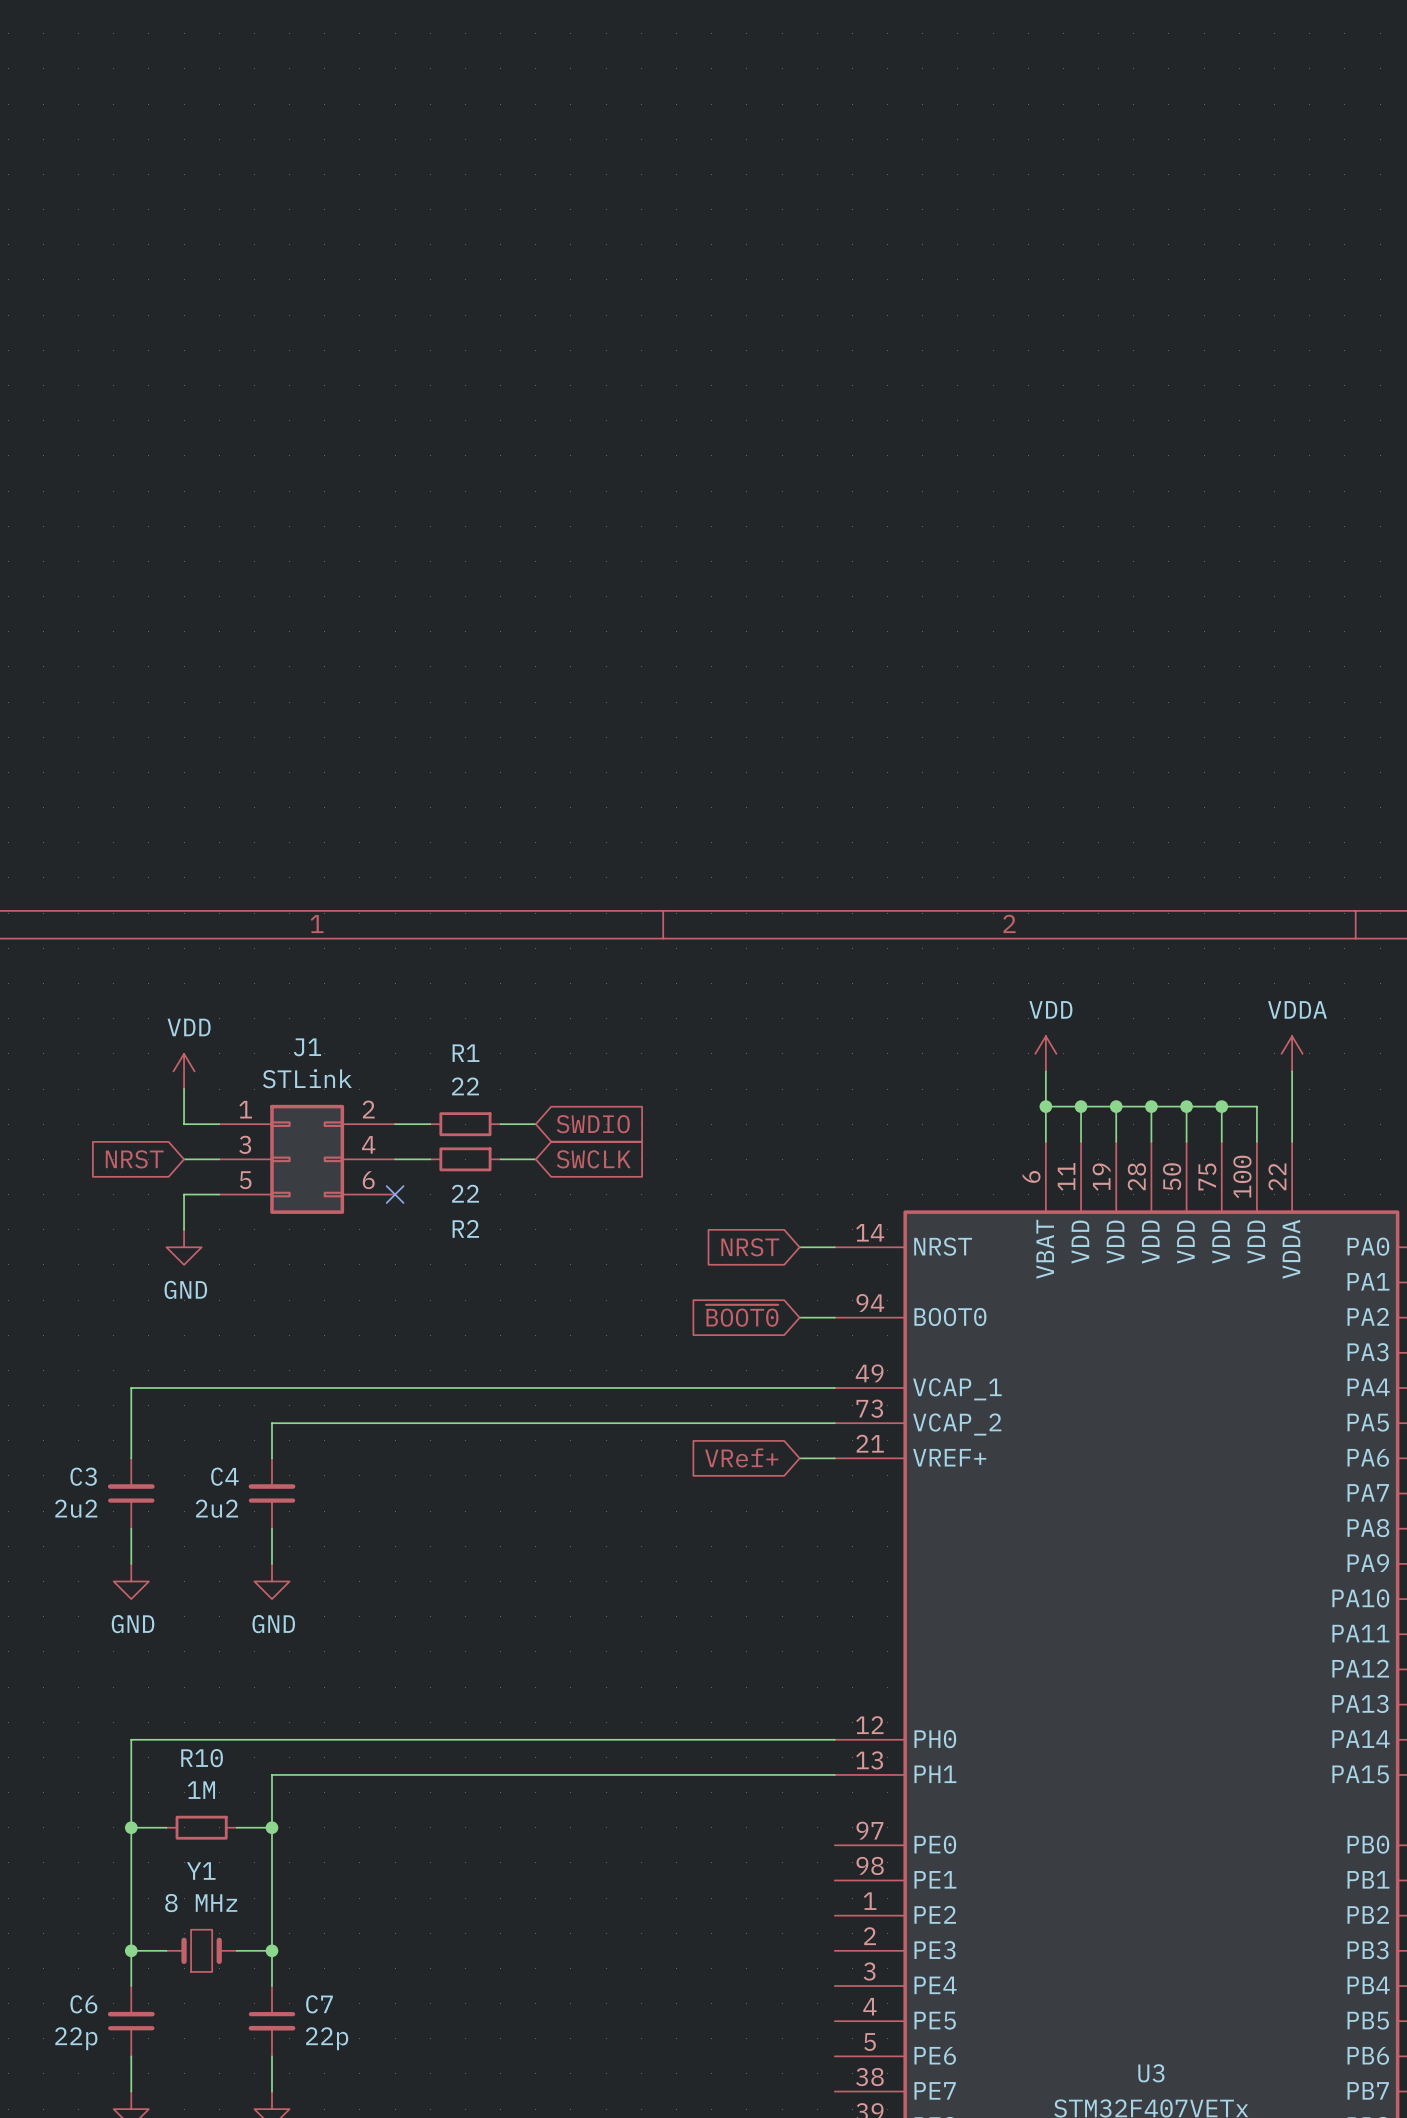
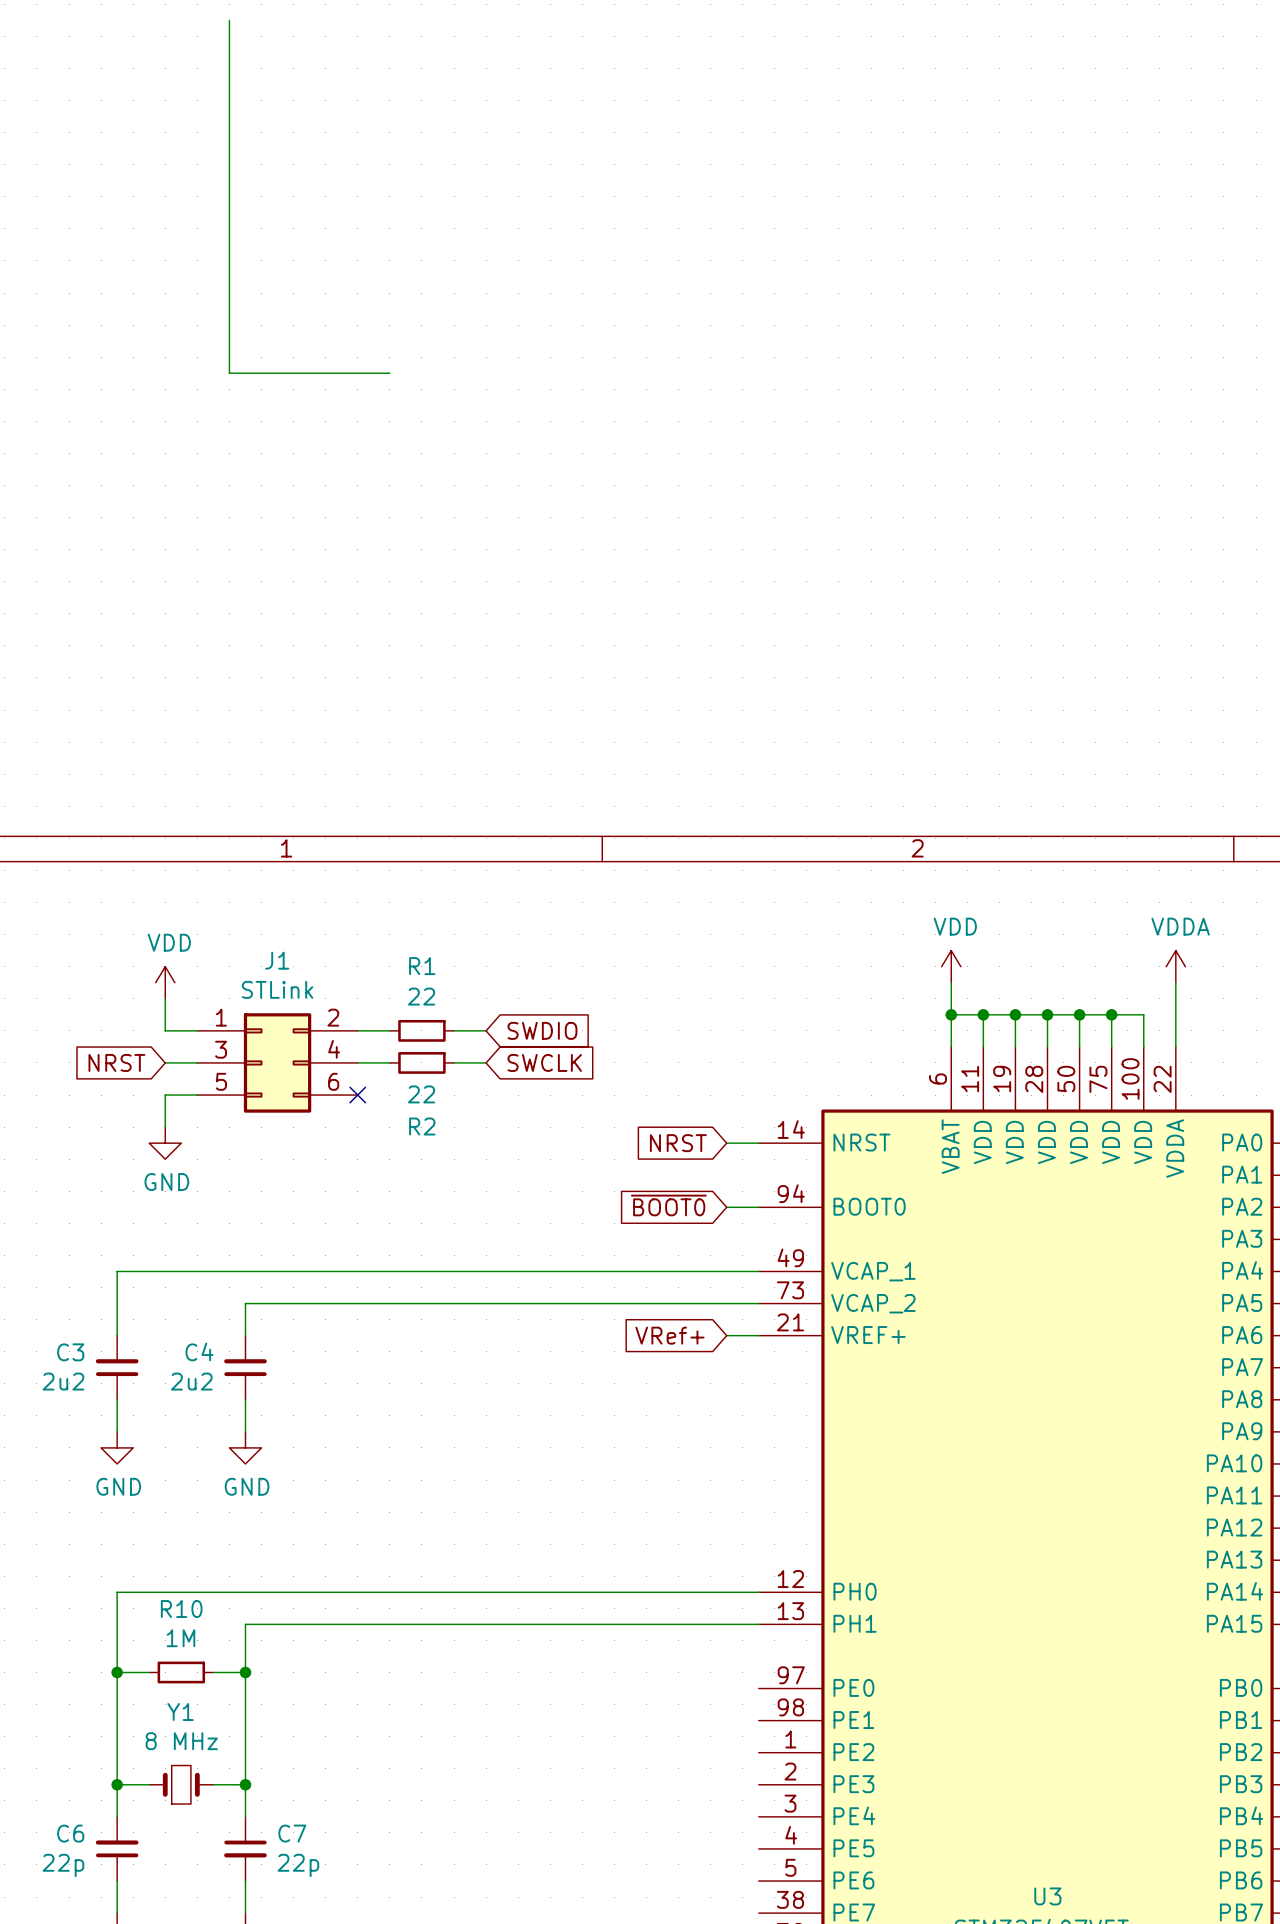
wire: none -> (229, 20) (229, 373) (389, 373)

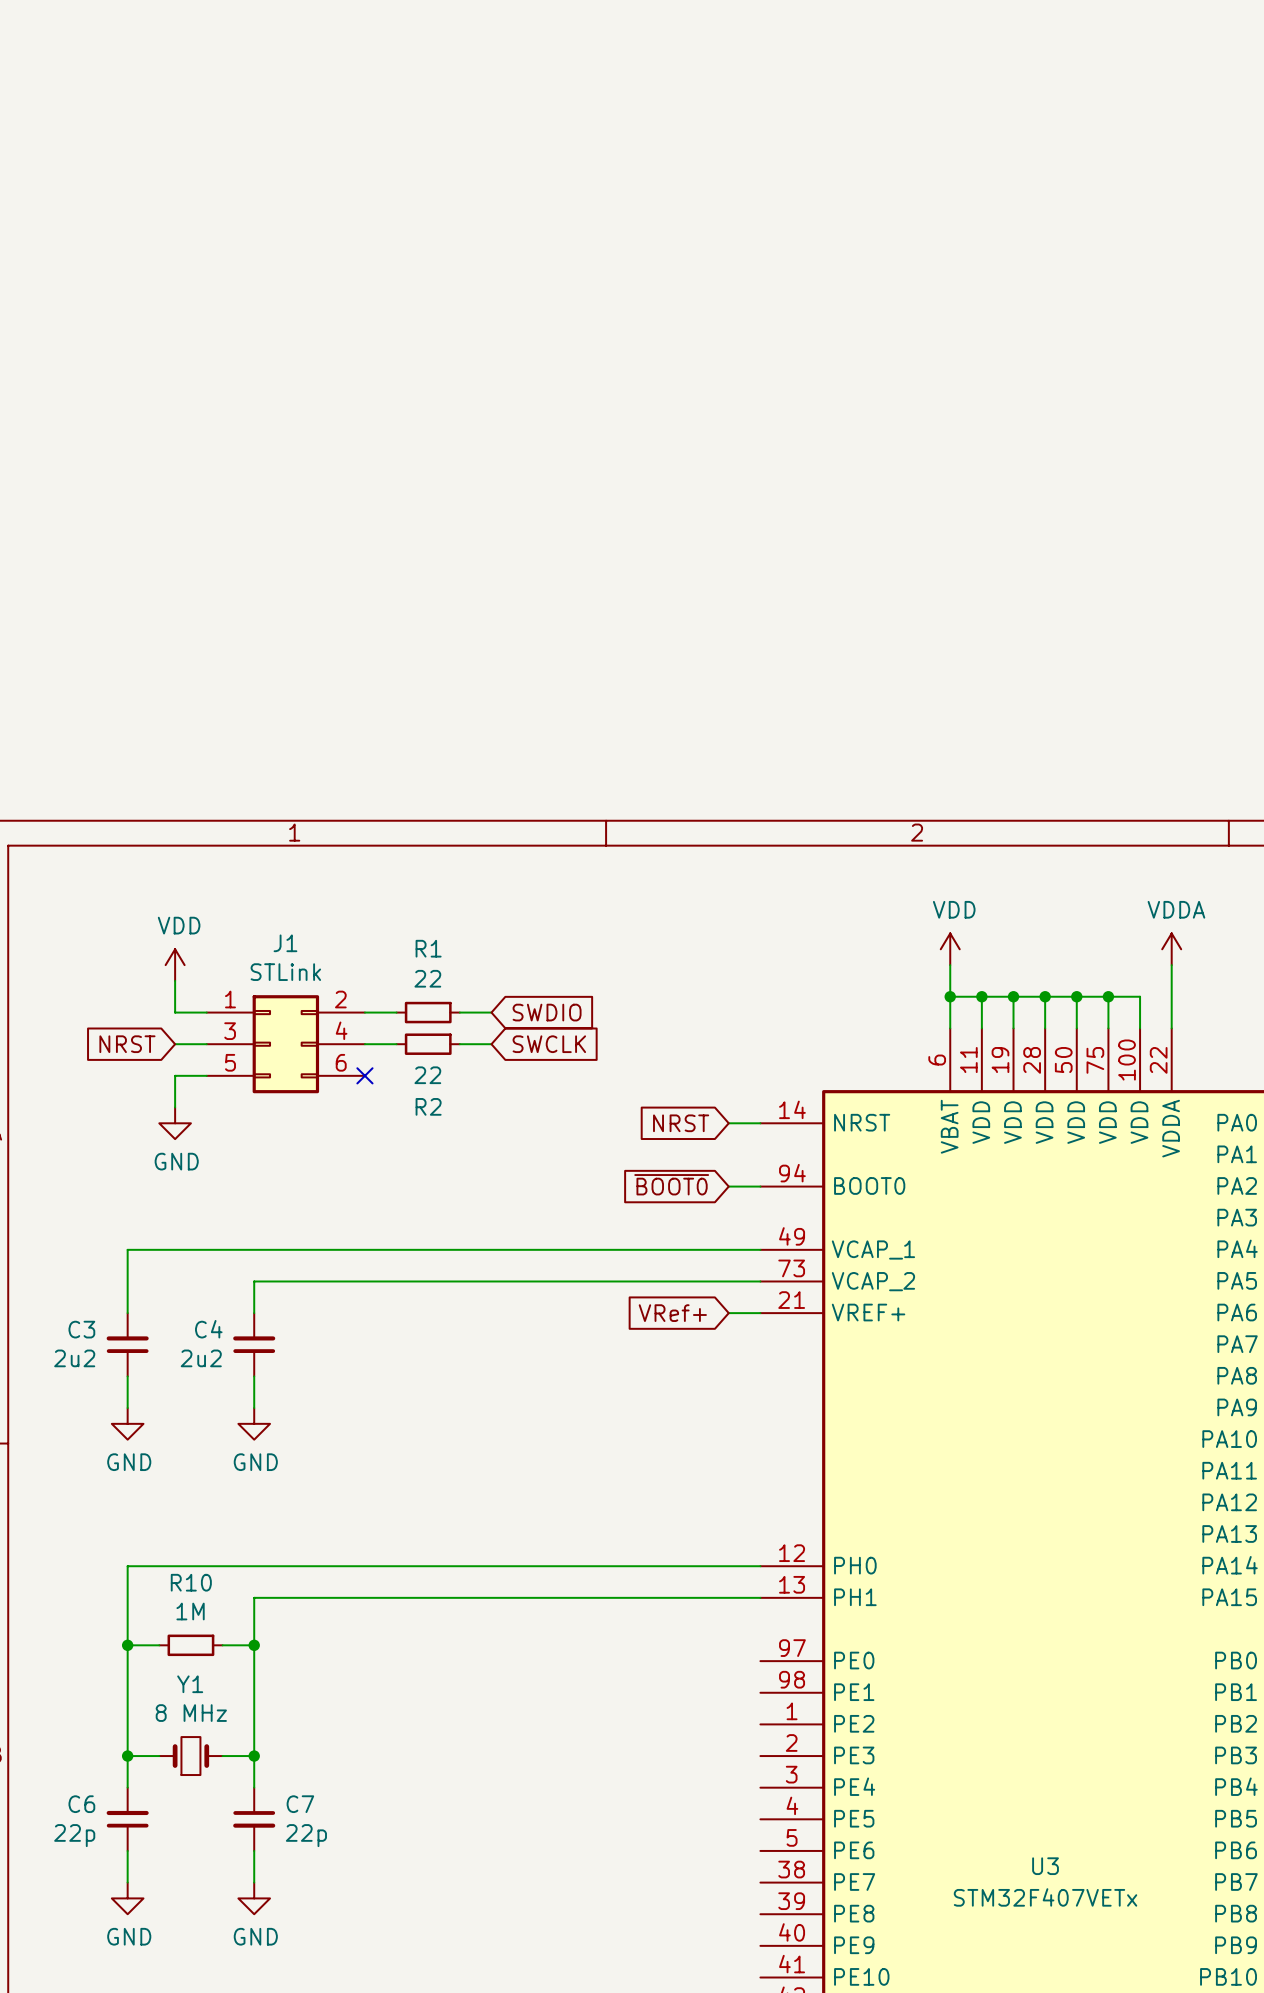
wire: (229, 20) (229, 373) (389, 373) -> none

